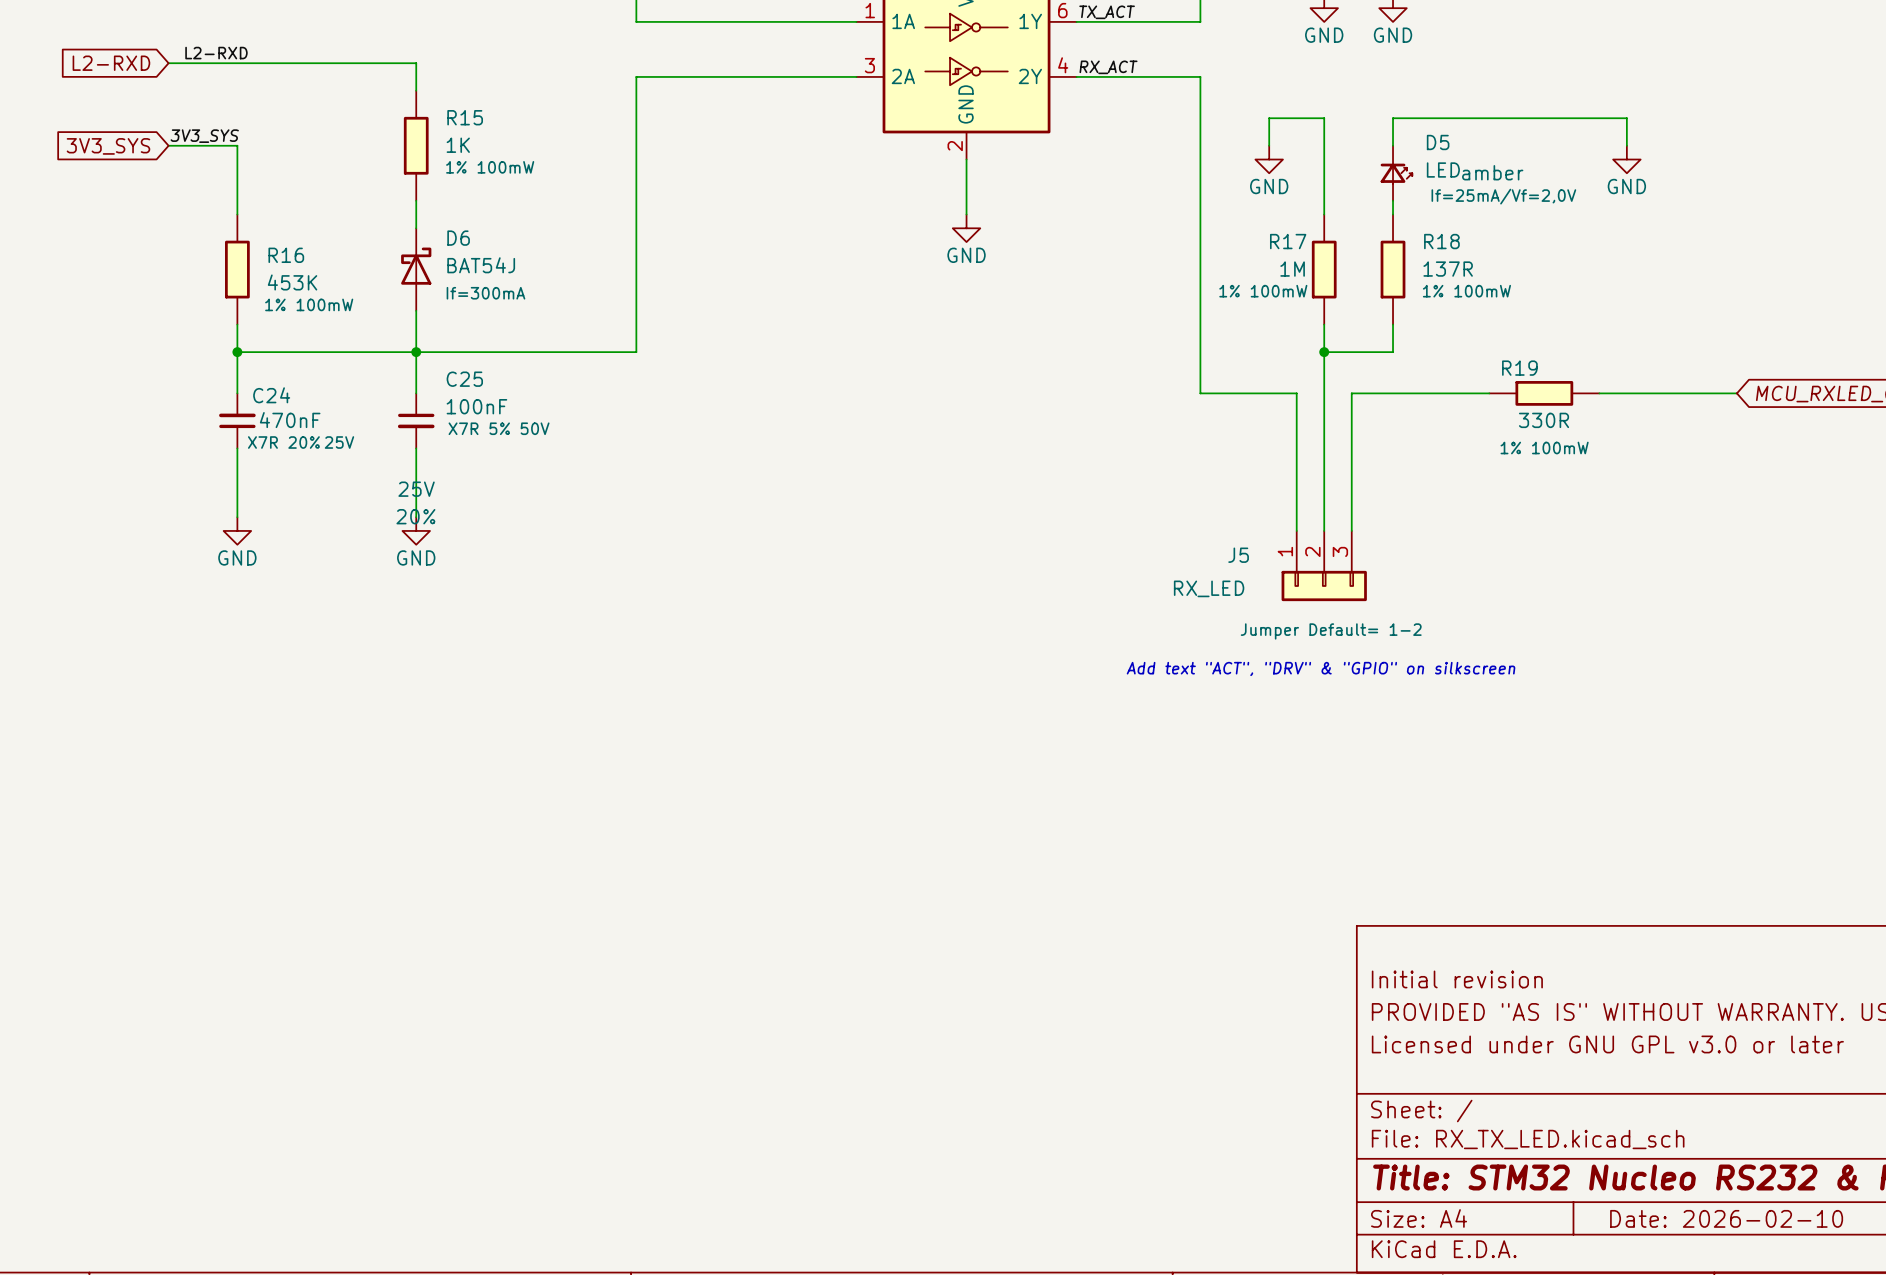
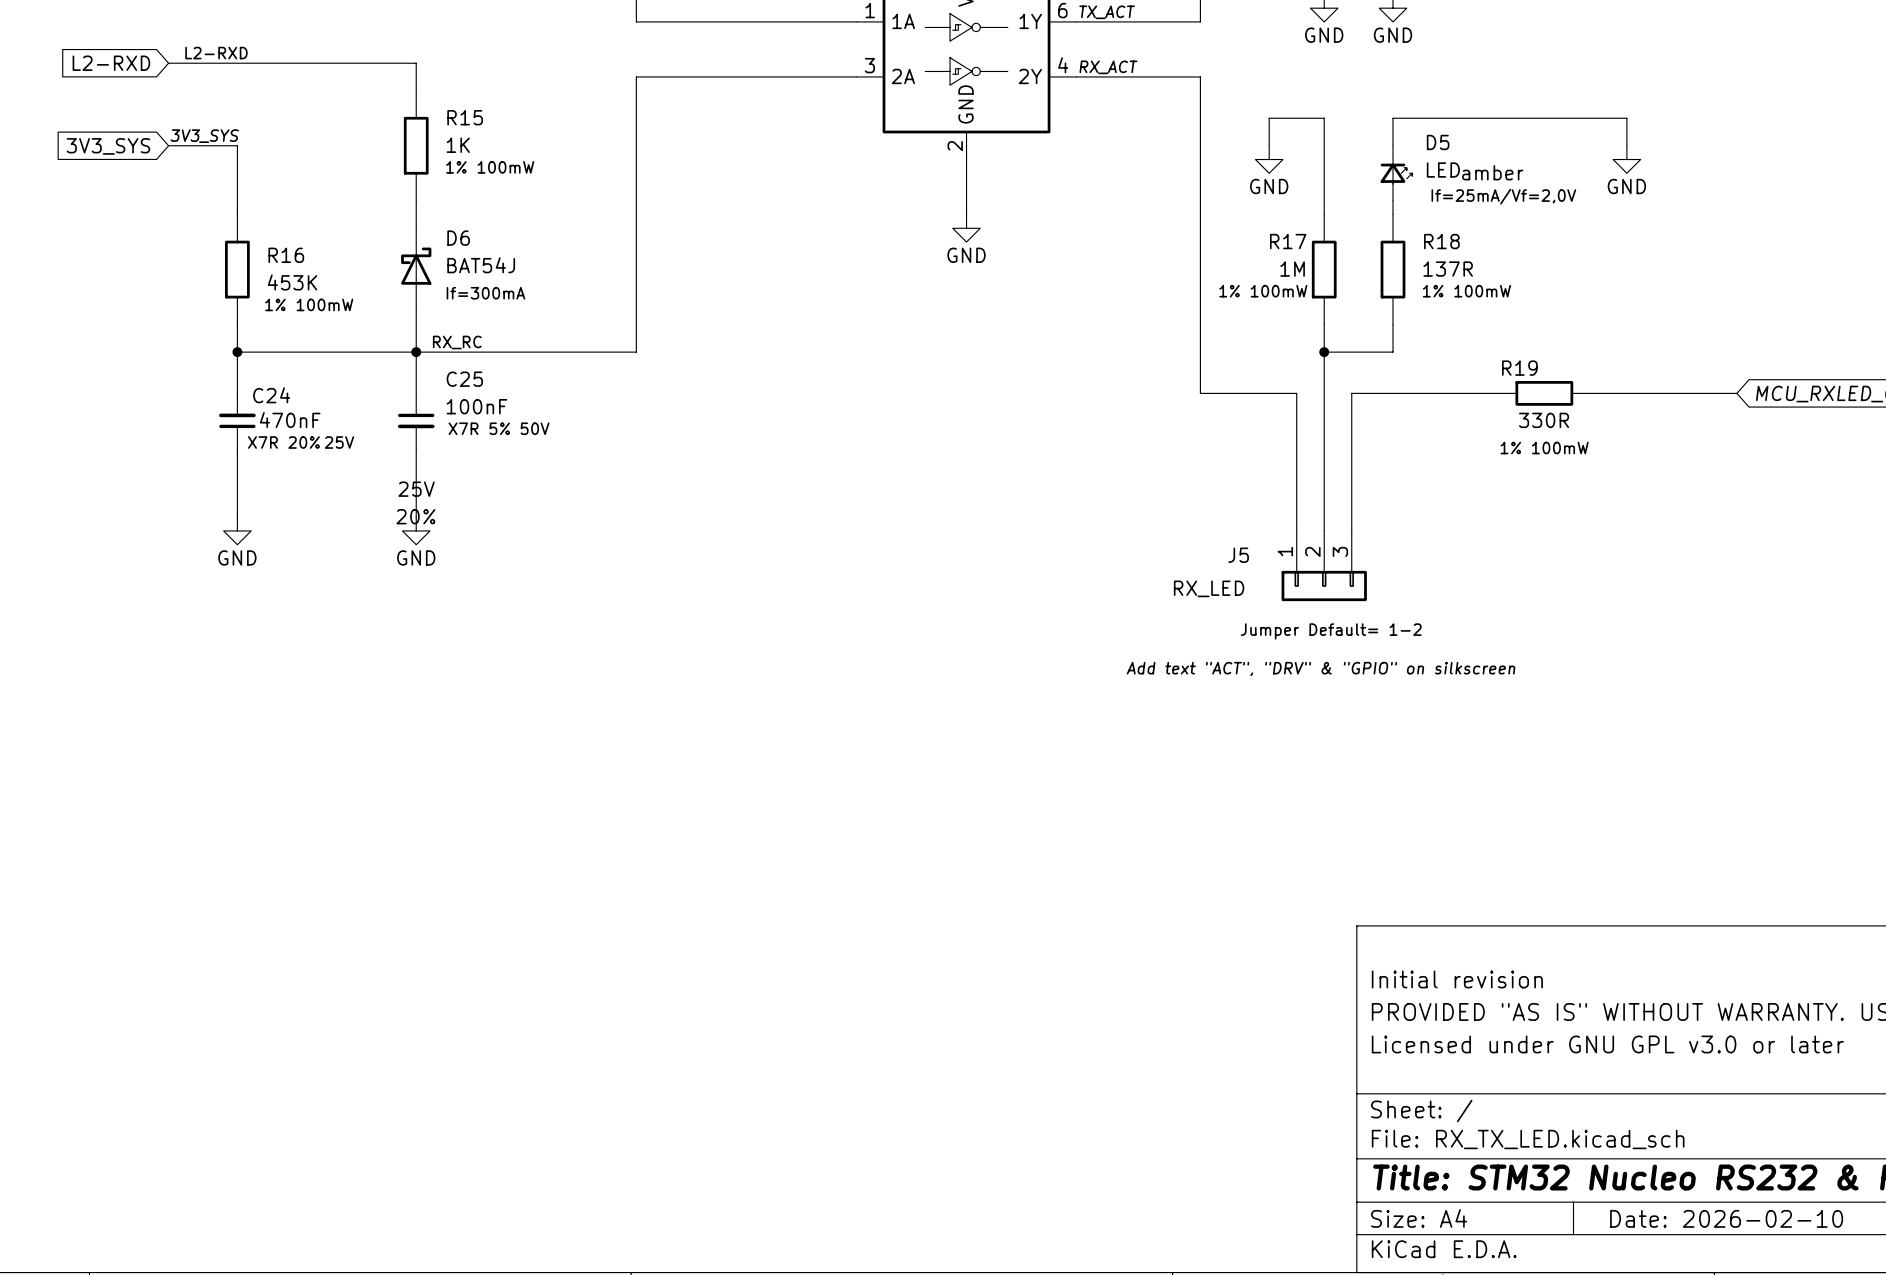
label: none -> RX_RC (457, 342)

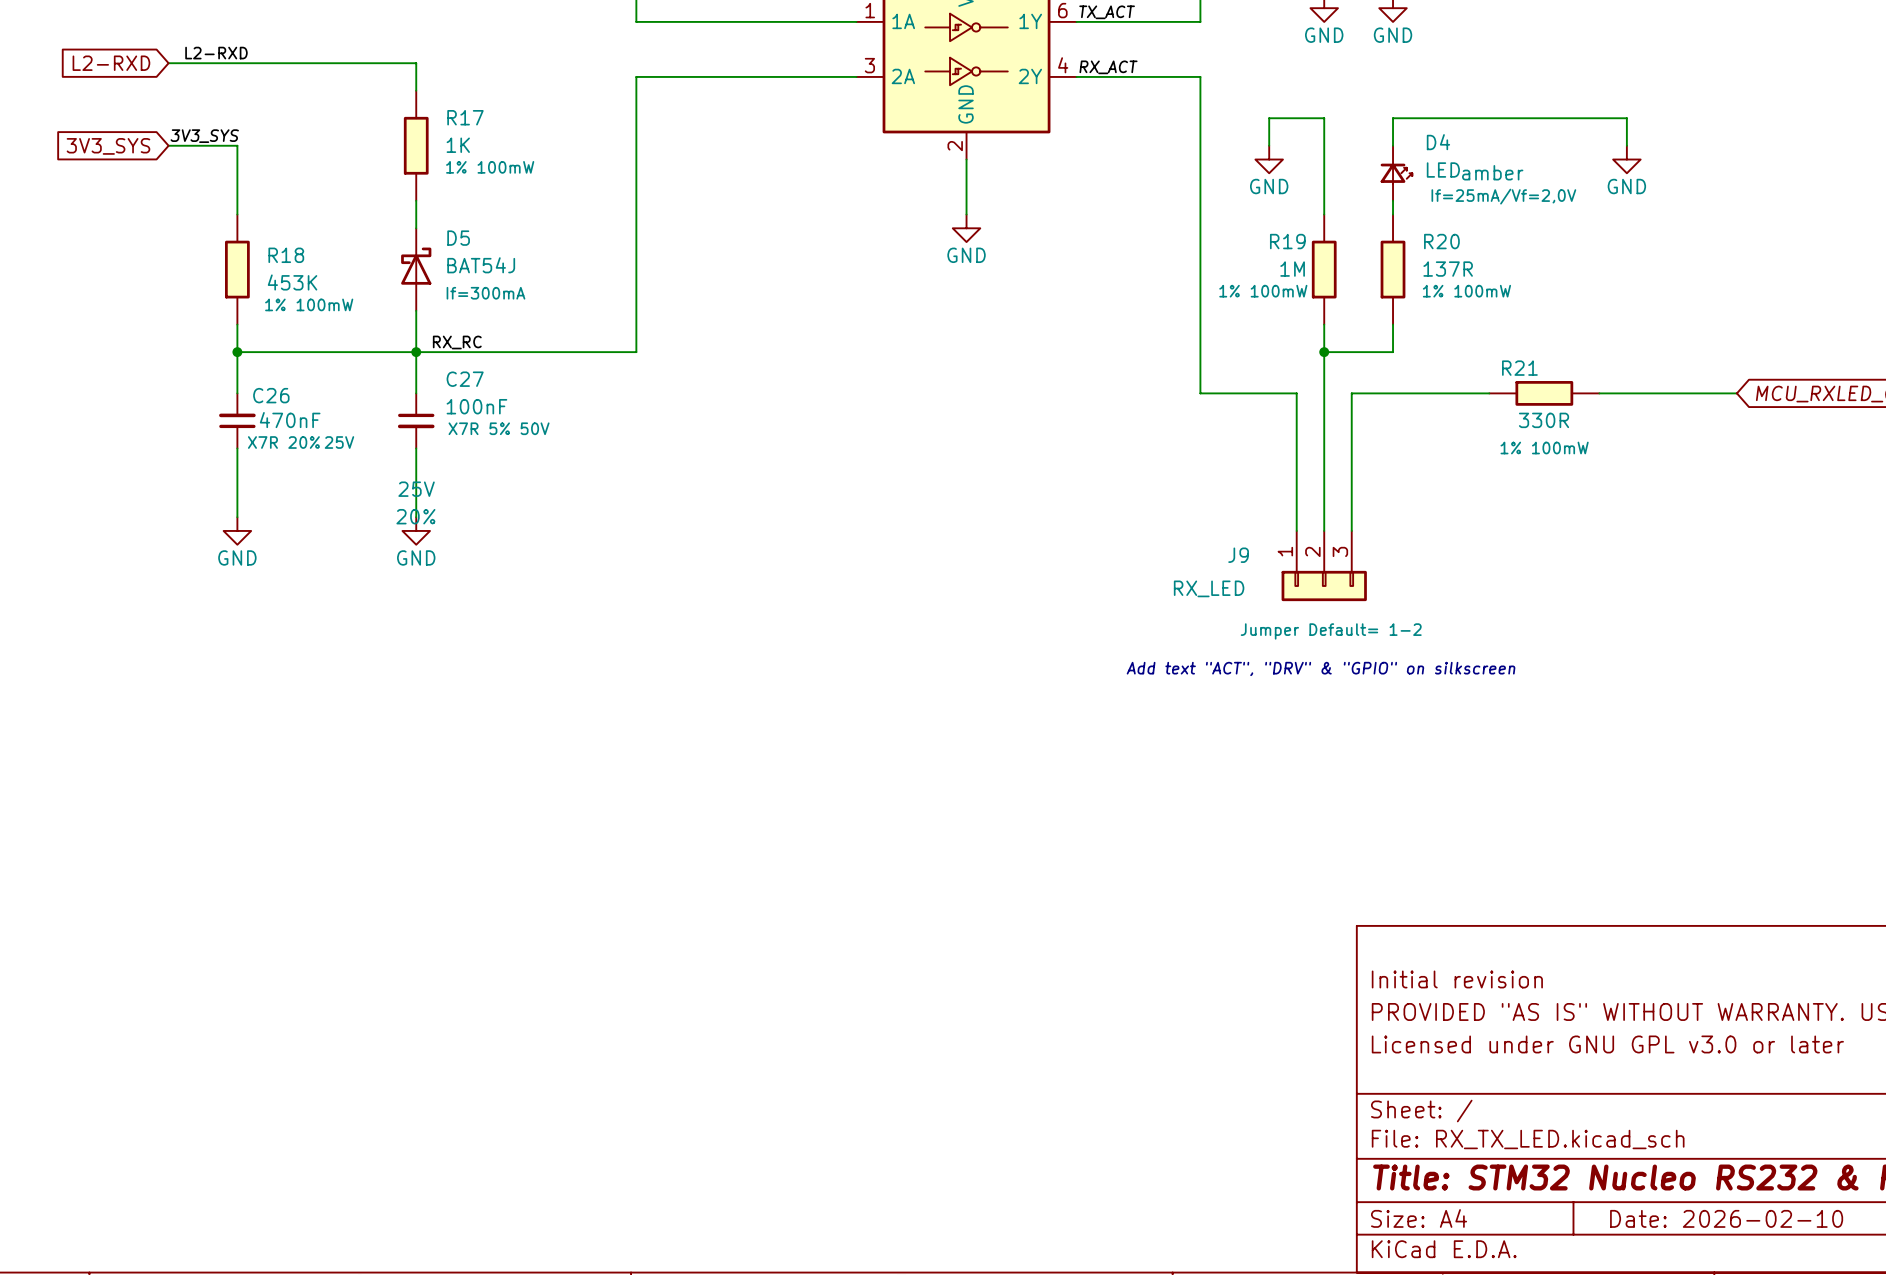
R15 name: R15 (465, 117) -> R17 (465, 117)
D5 name: D5 (1438, 142) -> D4 (1438, 142)
D6 name: D6 (458, 238) -> D5 (458, 238)
R17 name: R17 (1288, 241) -> R19 (1287, 241)
R18 name: R18 (1441, 241) -> R20 (1441, 241)
R16 name: R16 (286, 255) -> R18 (286, 255)
R19 name: R19 (1519, 368) -> R21 (1519, 368)
C25 name: C25 (464, 379) -> C27 (465, 379)
C24 name: C24 (271, 395) -> C26 (271, 395)
J5 name: J5 (1238, 555) -> J9 (1238, 555)

